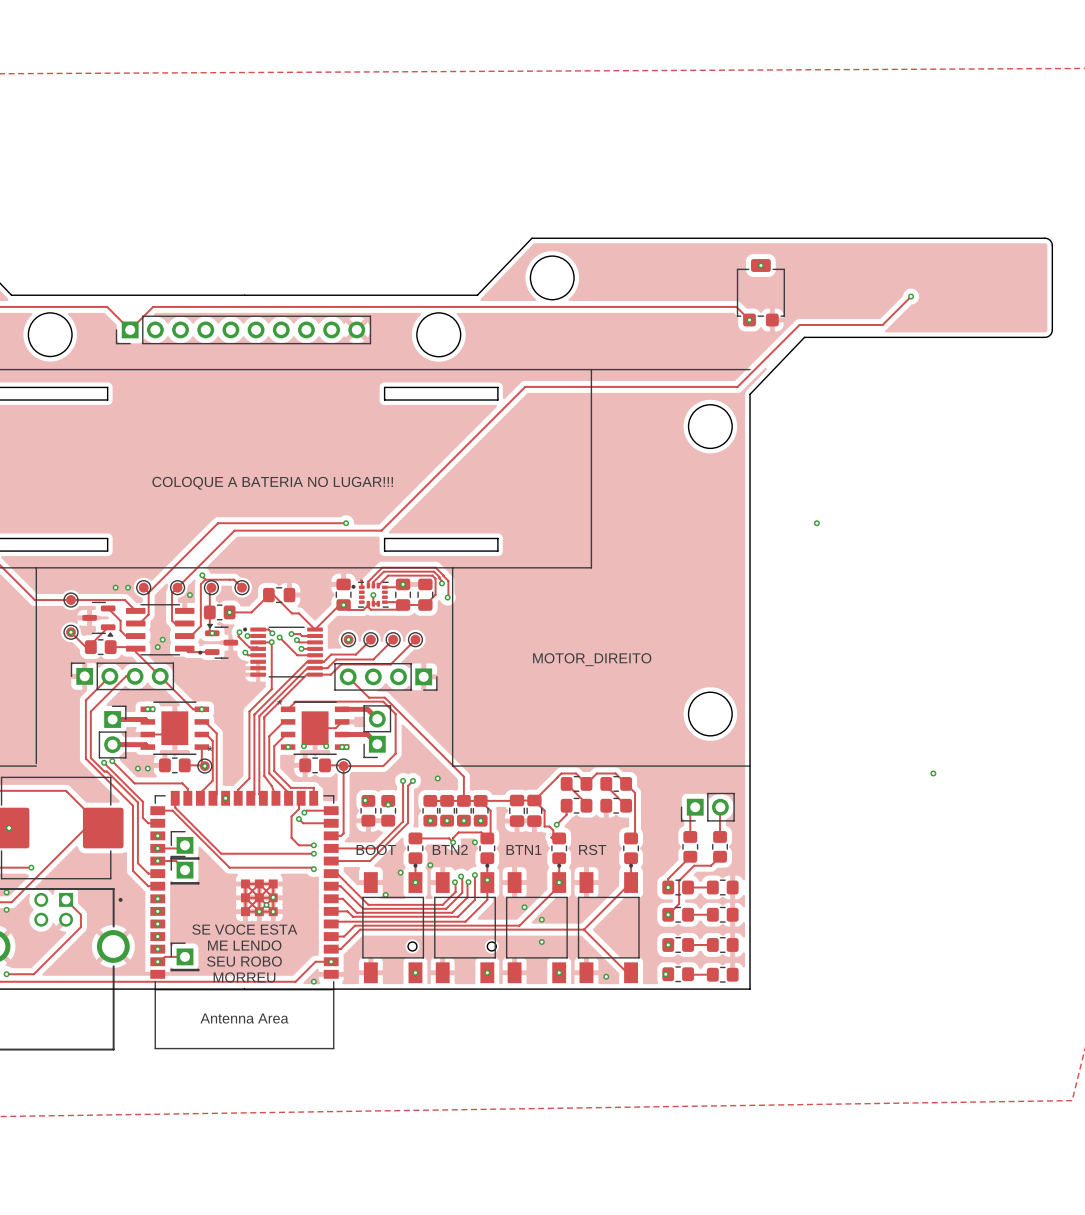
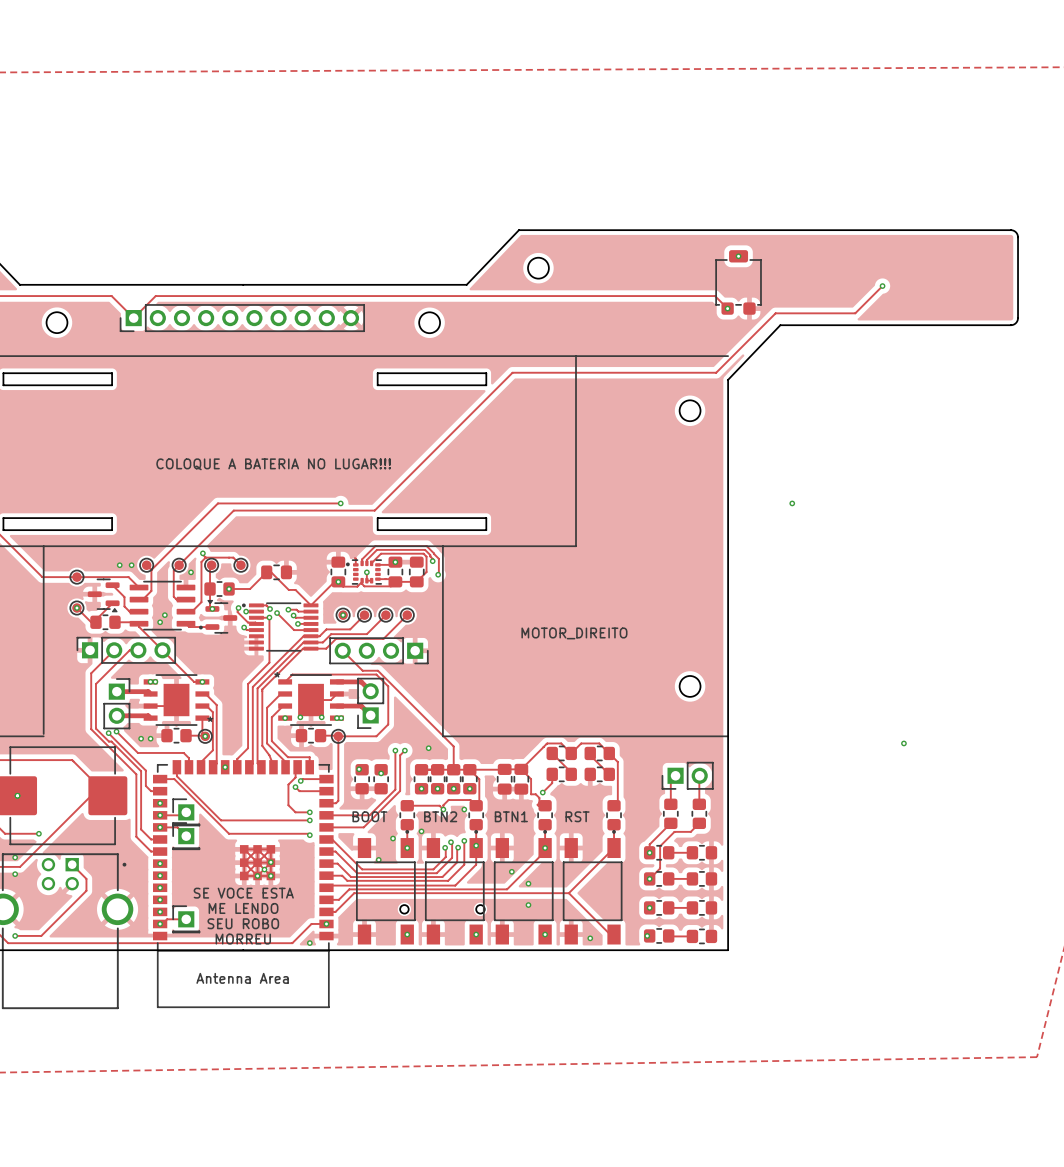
round board edge size: [530, 255, 575, 300] -> [527, 257, 550, 279]
round board edge size: [28, 312, 73, 357] -> [46, 311, 68, 334]
round board edge size: [416, 312, 461, 357] -> [418, 312, 441, 334]
round board edge size: [688, 404, 733, 449] -> [679, 400, 701, 422]
round board edge size: [688, 691, 733, 737] -> [679, 675, 701, 698]

